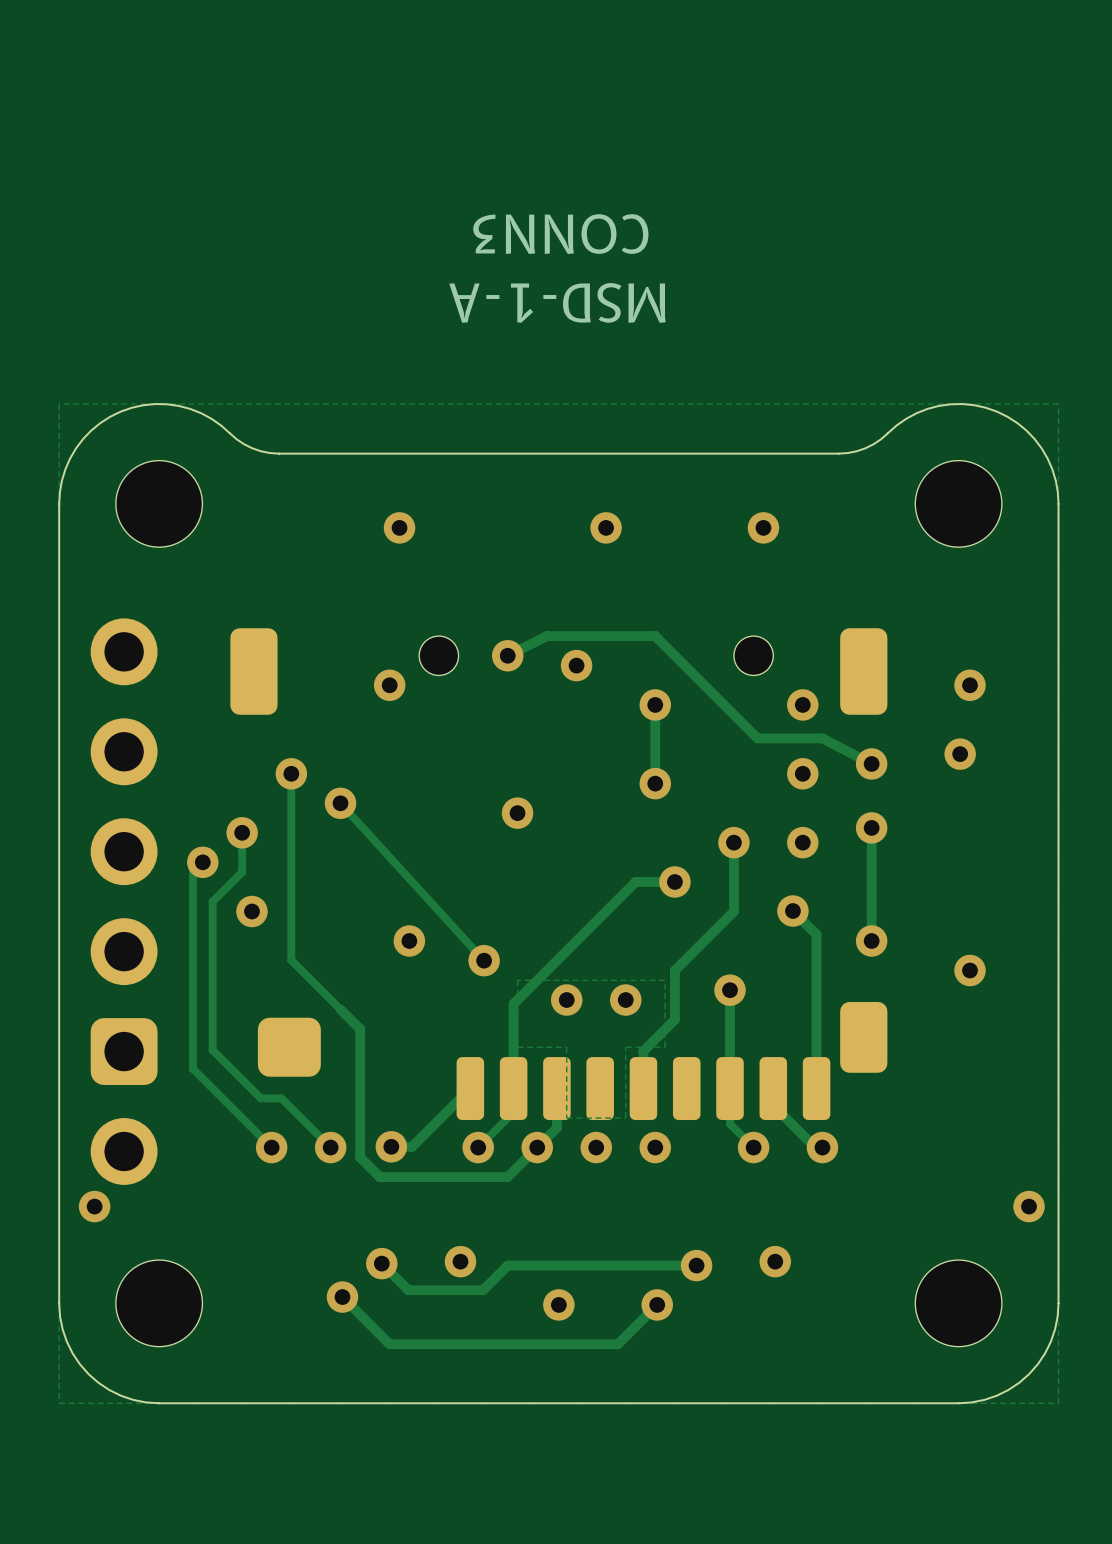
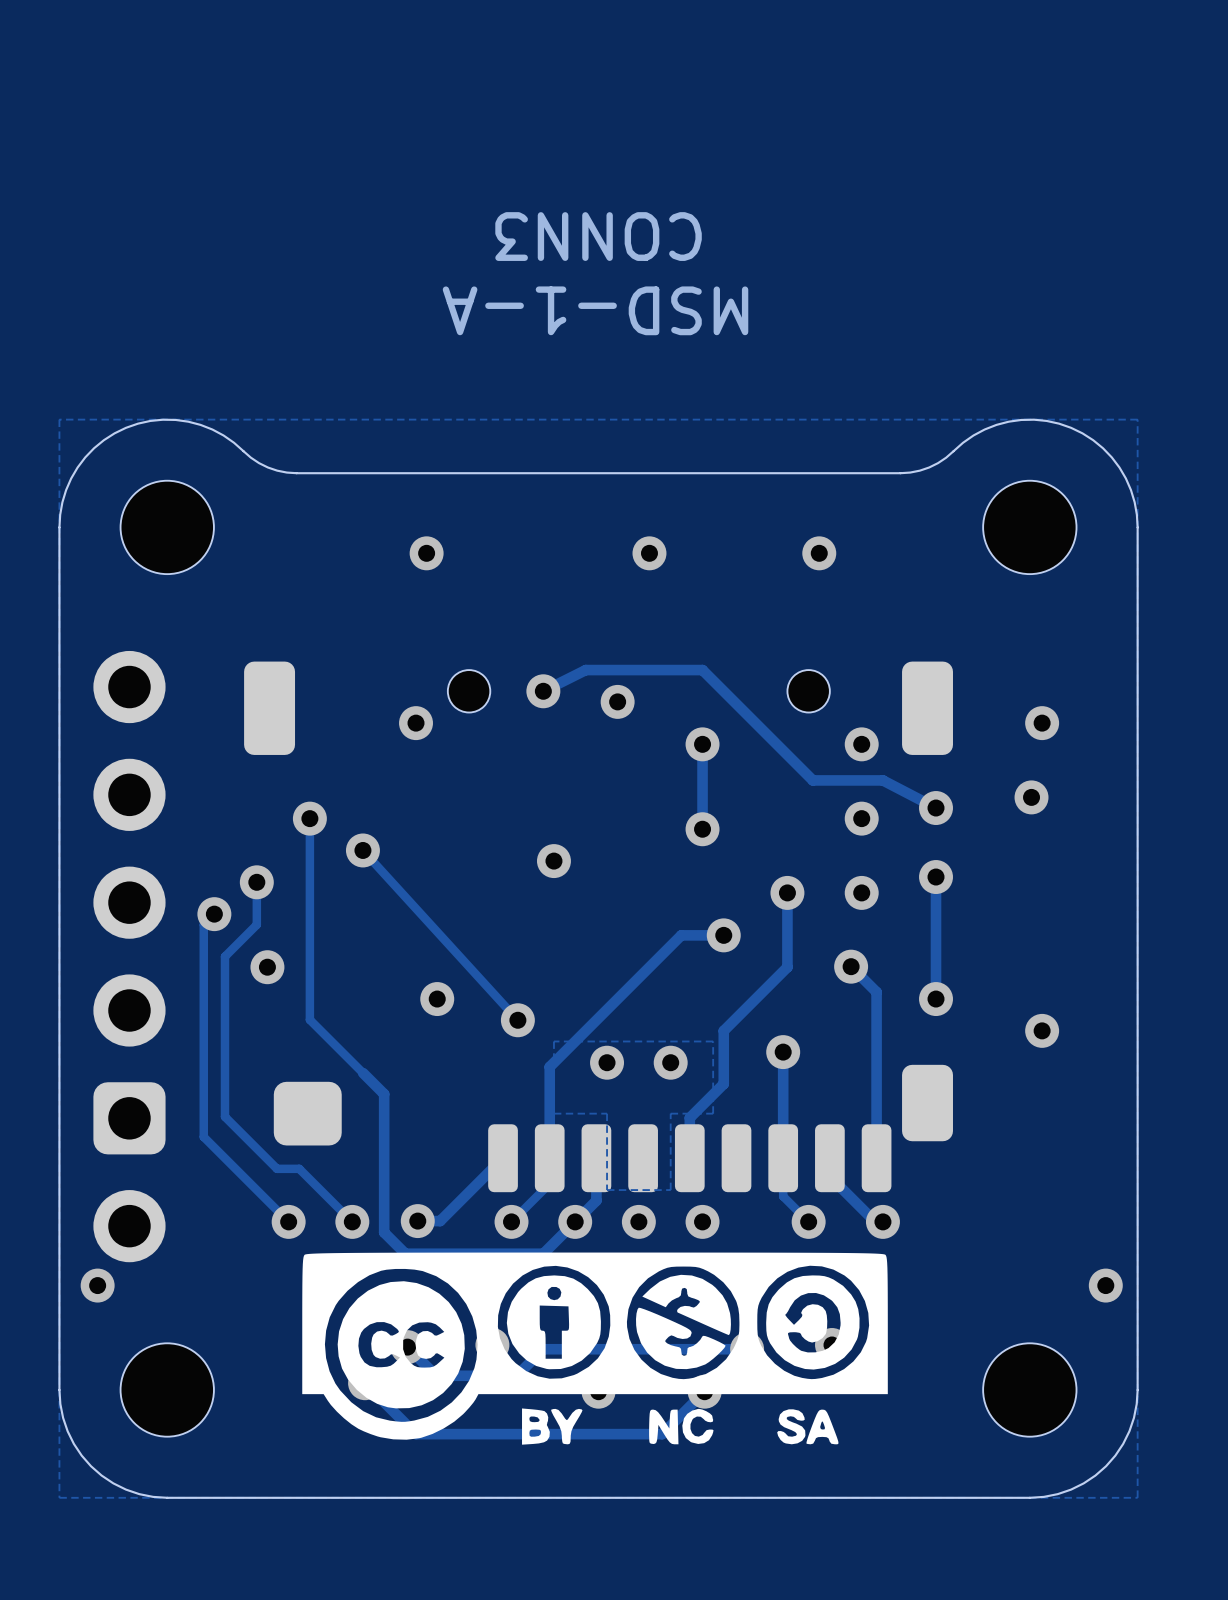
drawing: none -> [302, 1252, 888, 1445]

